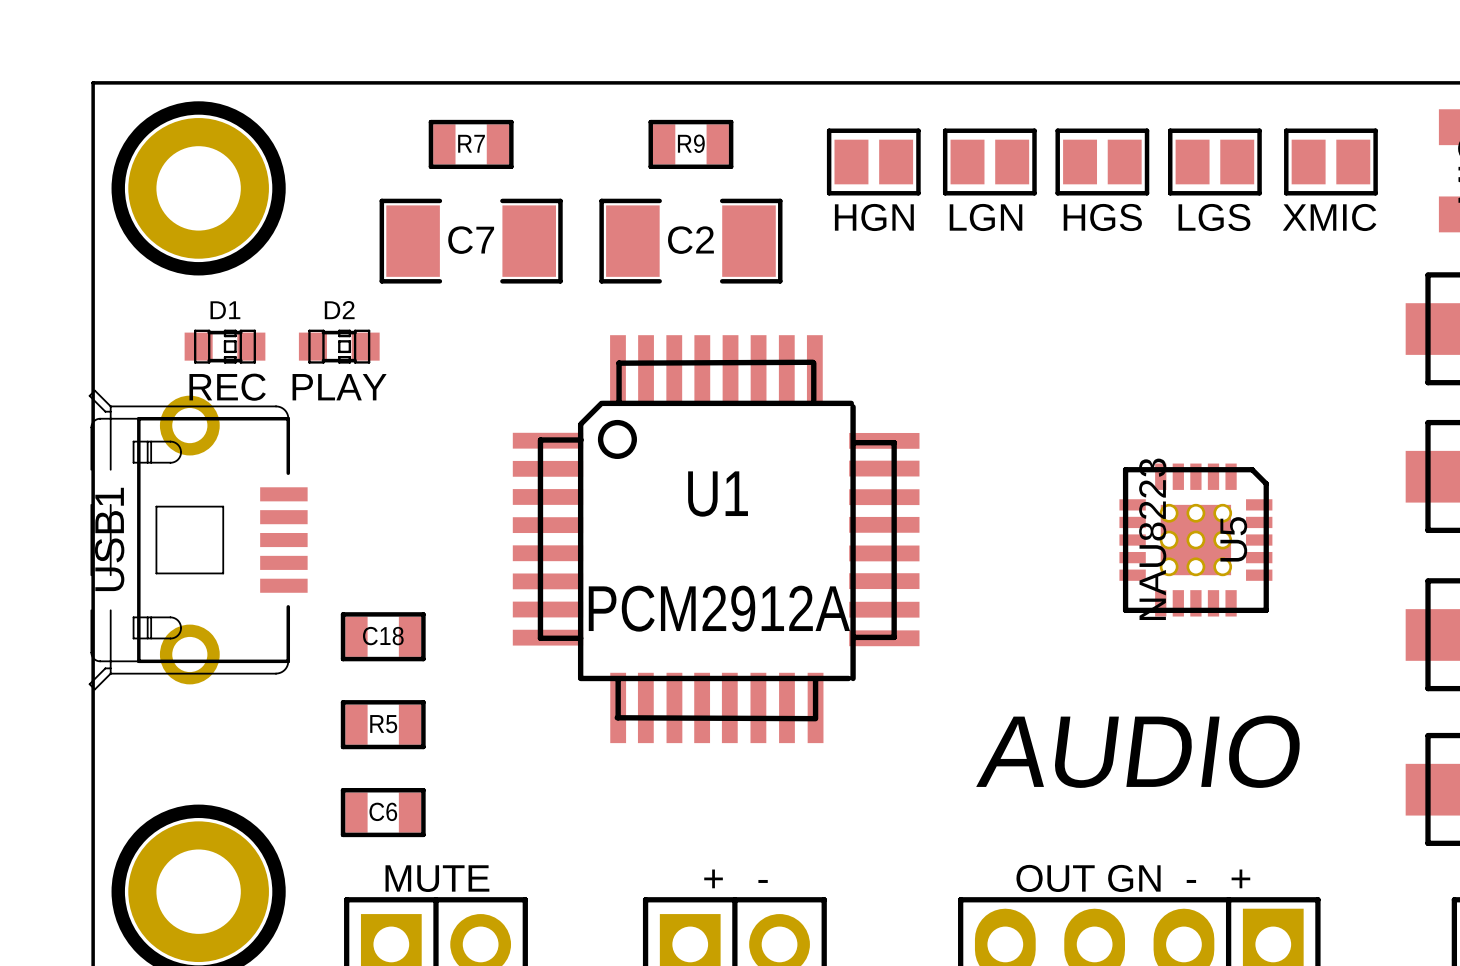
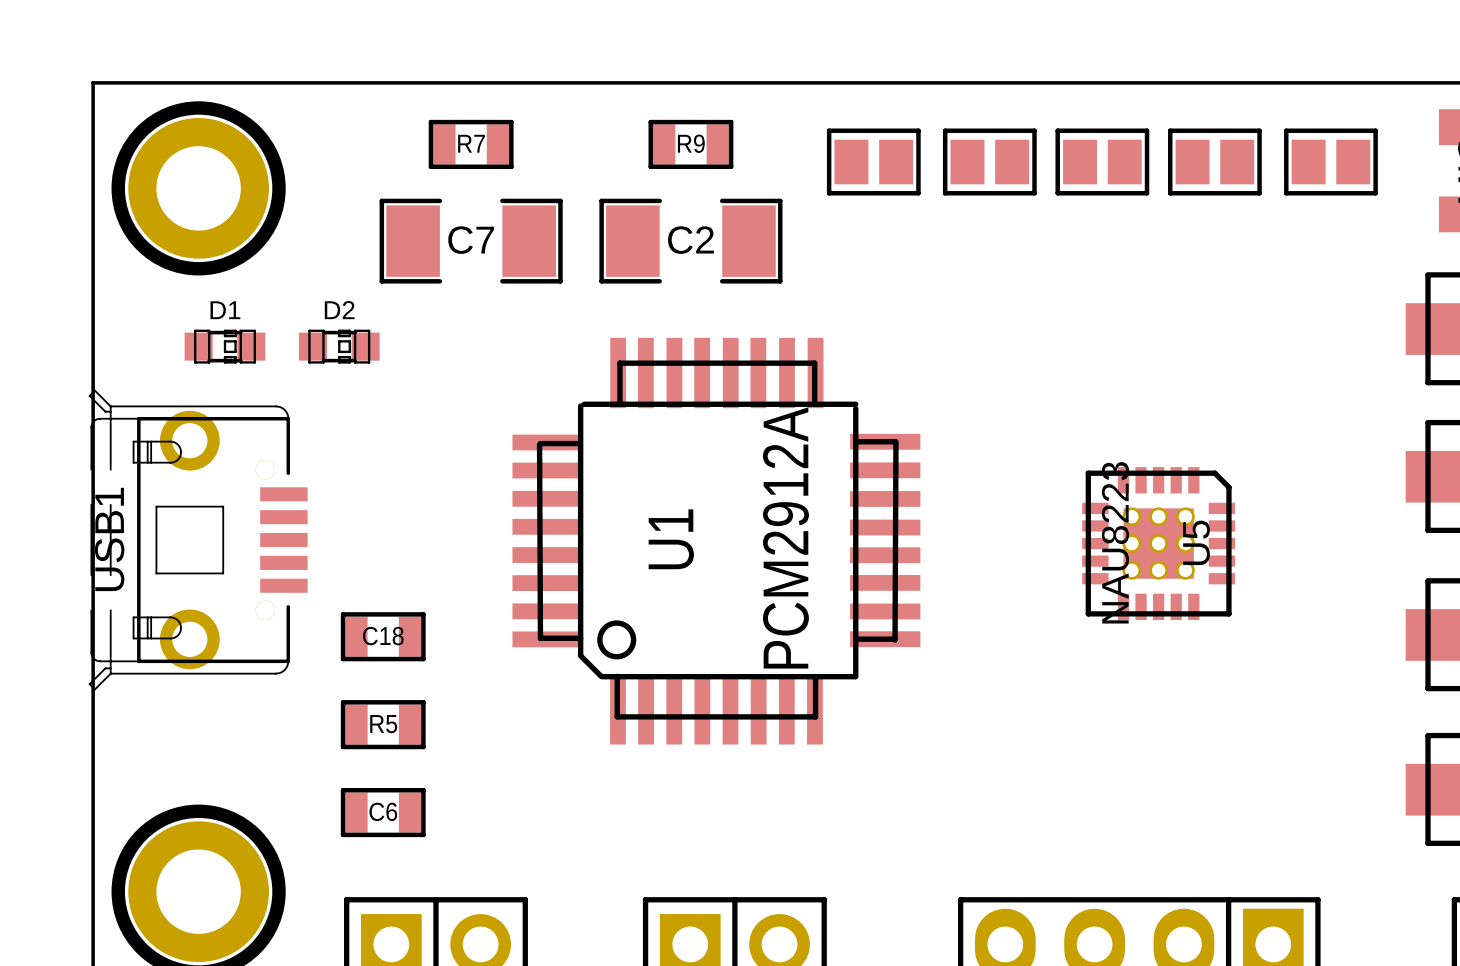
text: HGN (874, 217) -> none
text: LGN (986, 217) -> none
text: HGS (1102, 217) -> none
text: LGS (1214, 217) -> none
text: XMIC (1329, 217) -> none
text: REC (227, 387) -> none
text: PLAY (339, 387) -> none
USB1 footprint: [88, 389, 308, 691] -> [88, 389, 308, 691]
U1 rotation: 0° (716, 539) -> 90° counterclockwise (716, 541)
U5 position: (1195, 540) -> (1158, 543)
text: AUDIO (1138, 751) -> none
text: MUTE (437, 878) -> none
text: + - (736, 878) -> none
text: OUT GN - + (1133, 878) -> none

